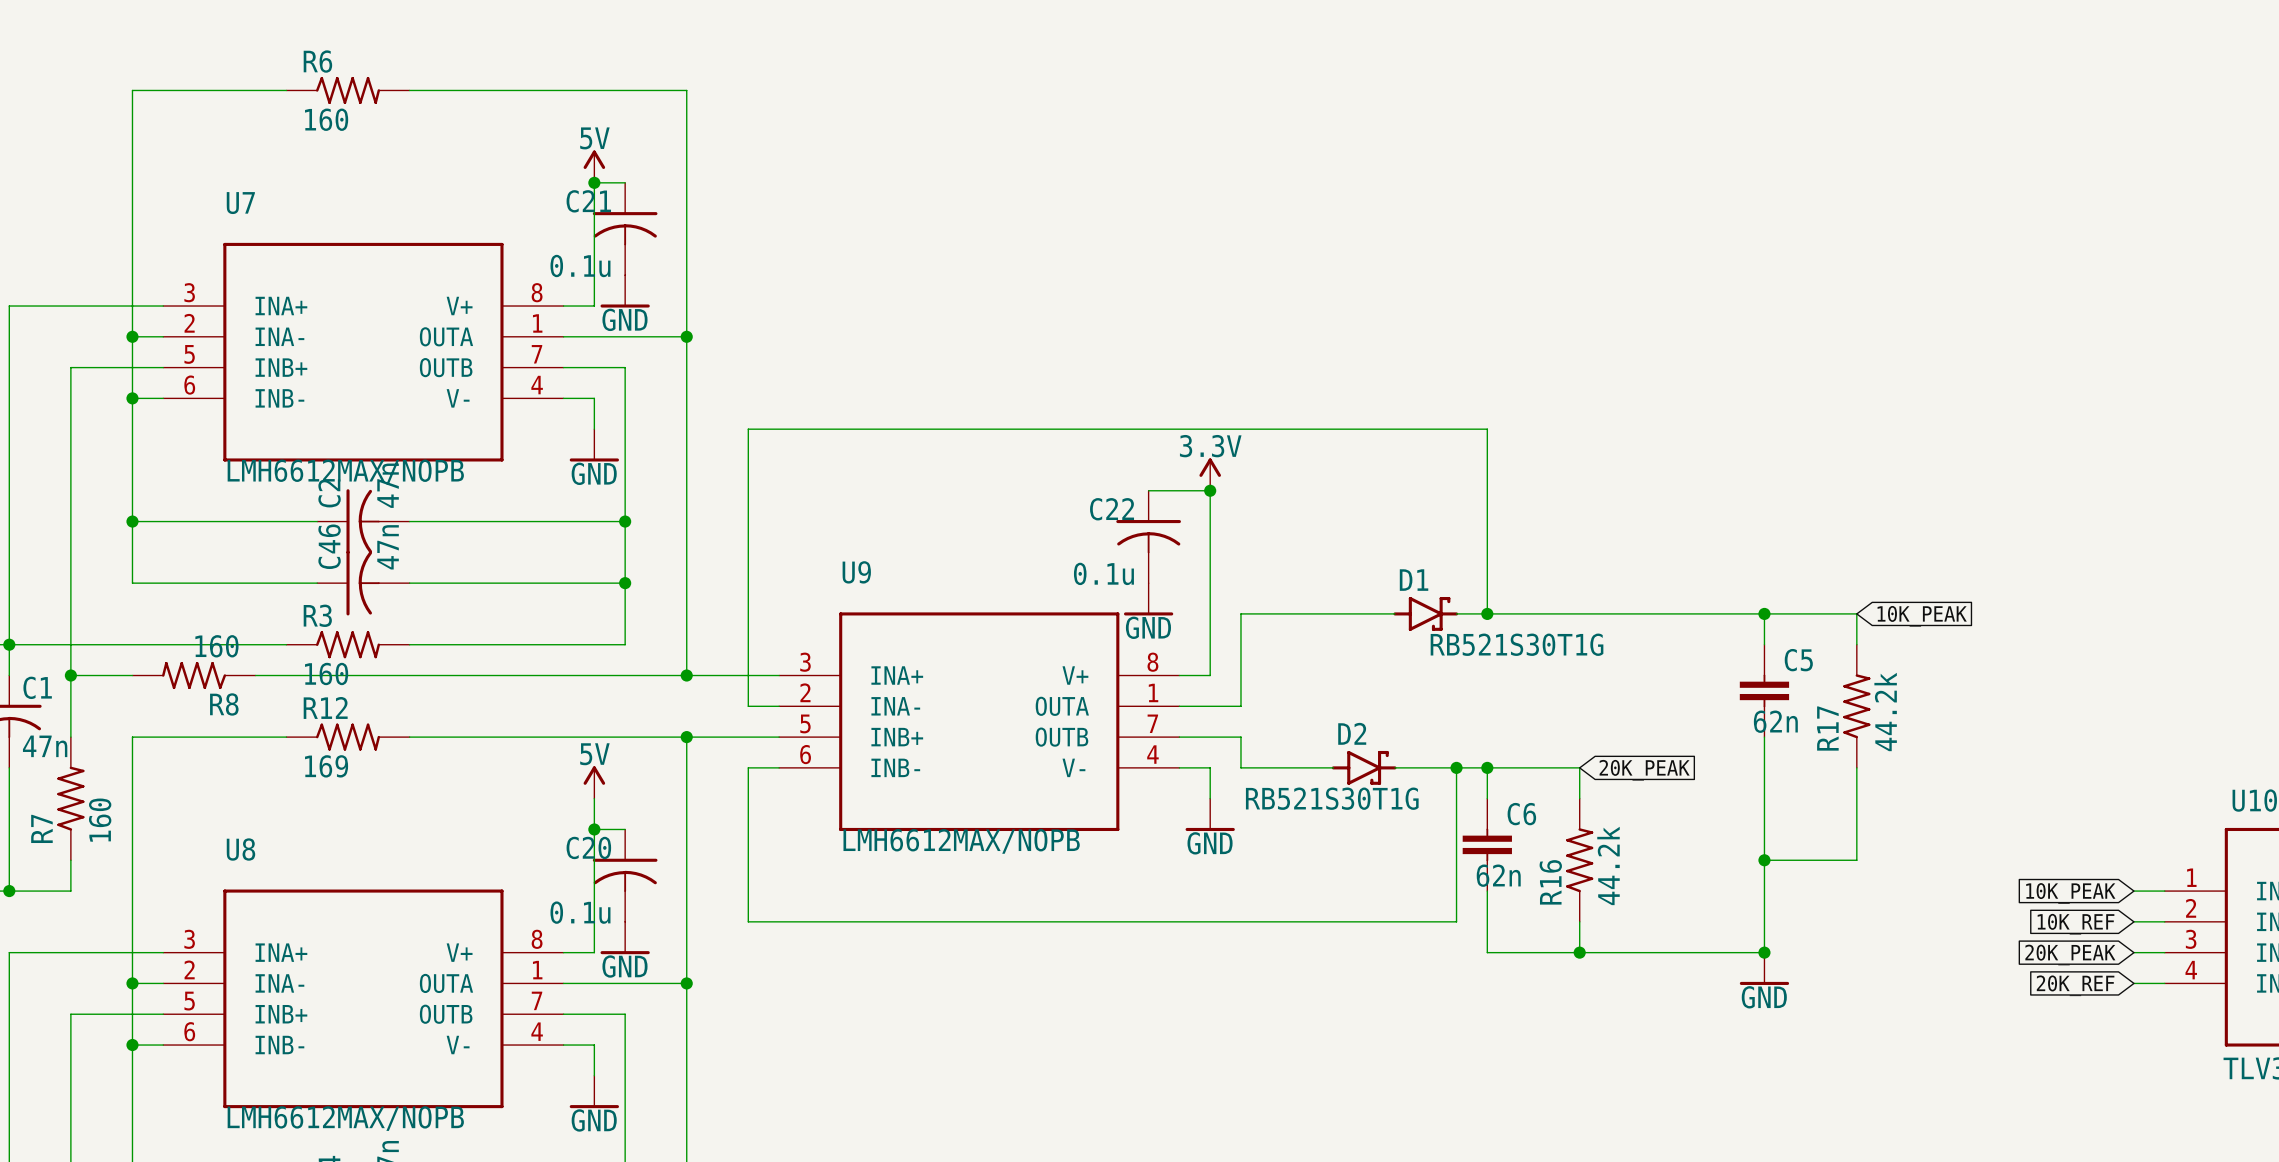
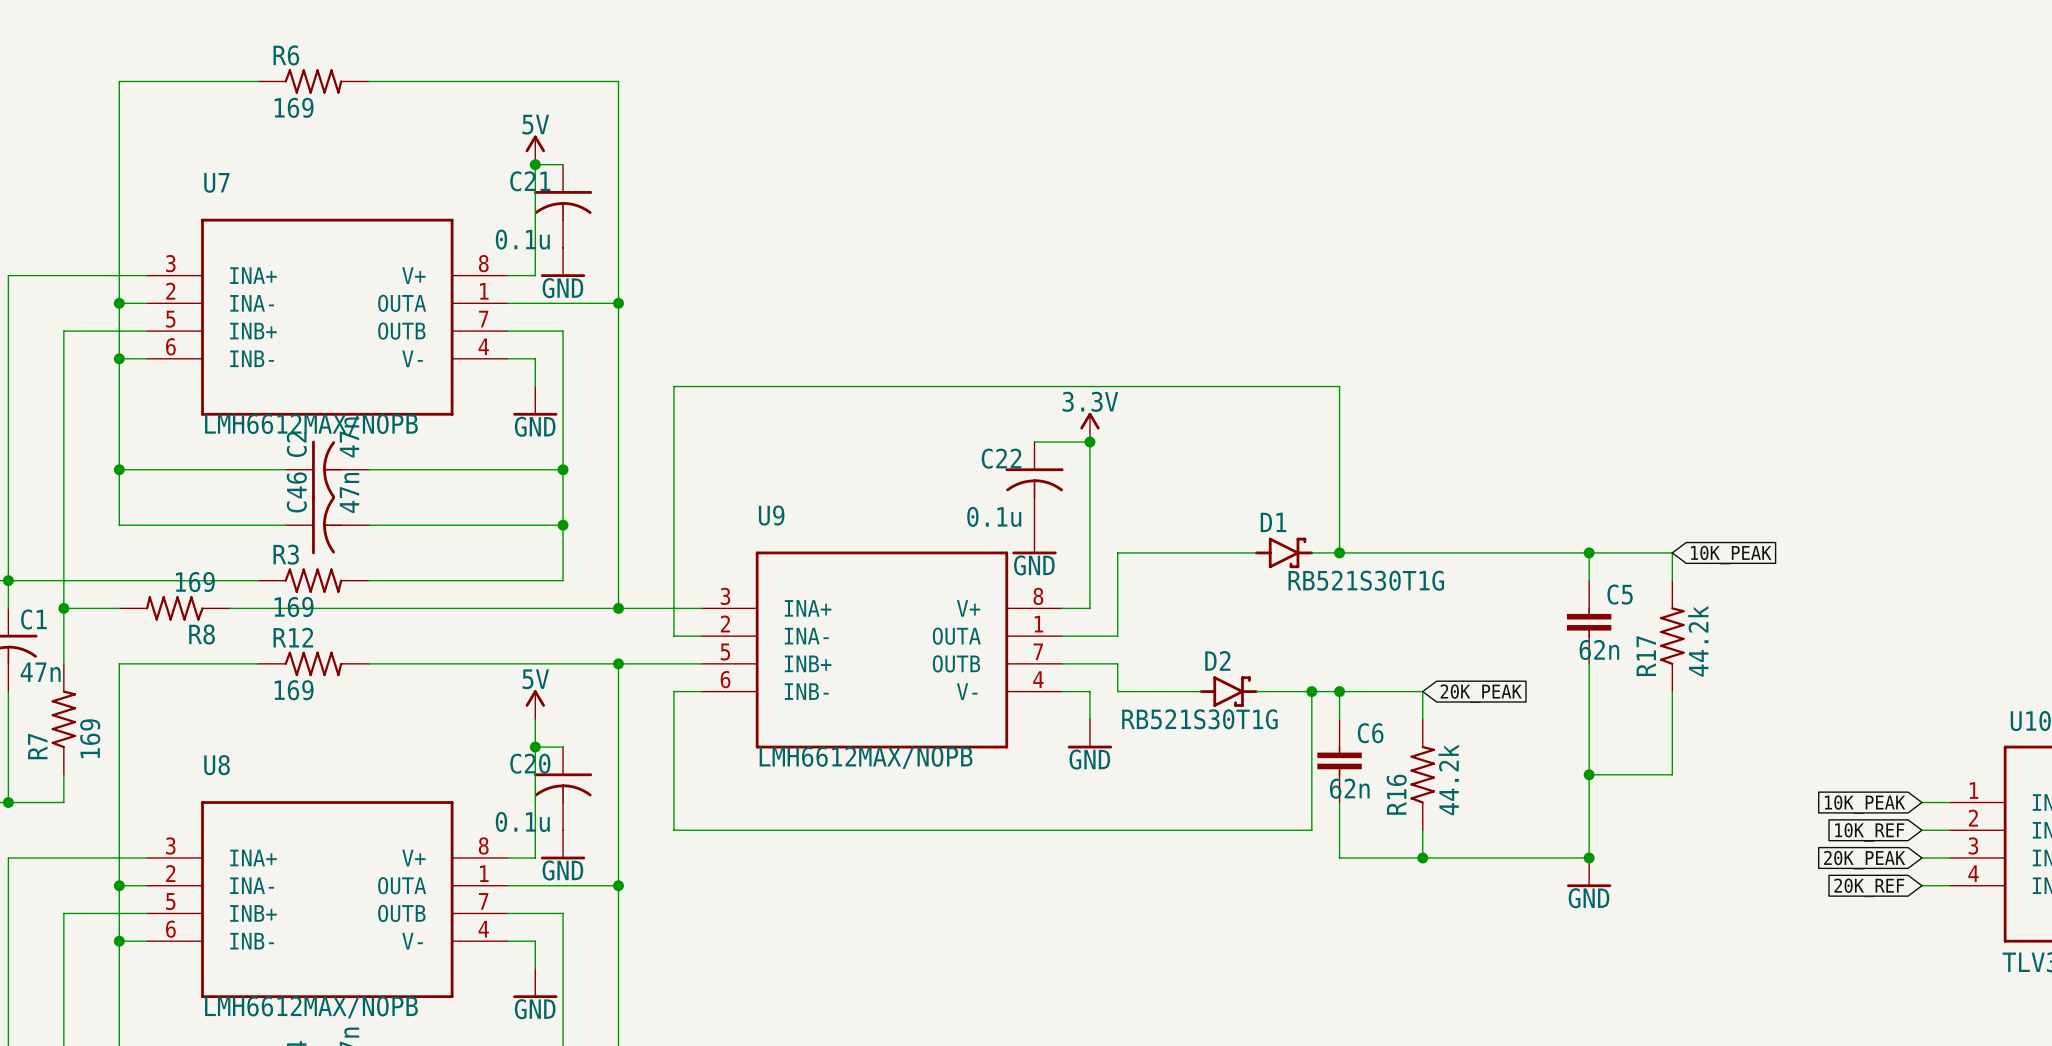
R6 value: 160 (326, 119) -> 169 (294, 107)
R8 value: 160 (216, 646) -> 169 (195, 582)
R3 value: 160 (326, 673) -> 169 (294, 607)
R7 value: 160 (100, 820) -> 169 (90, 738)

